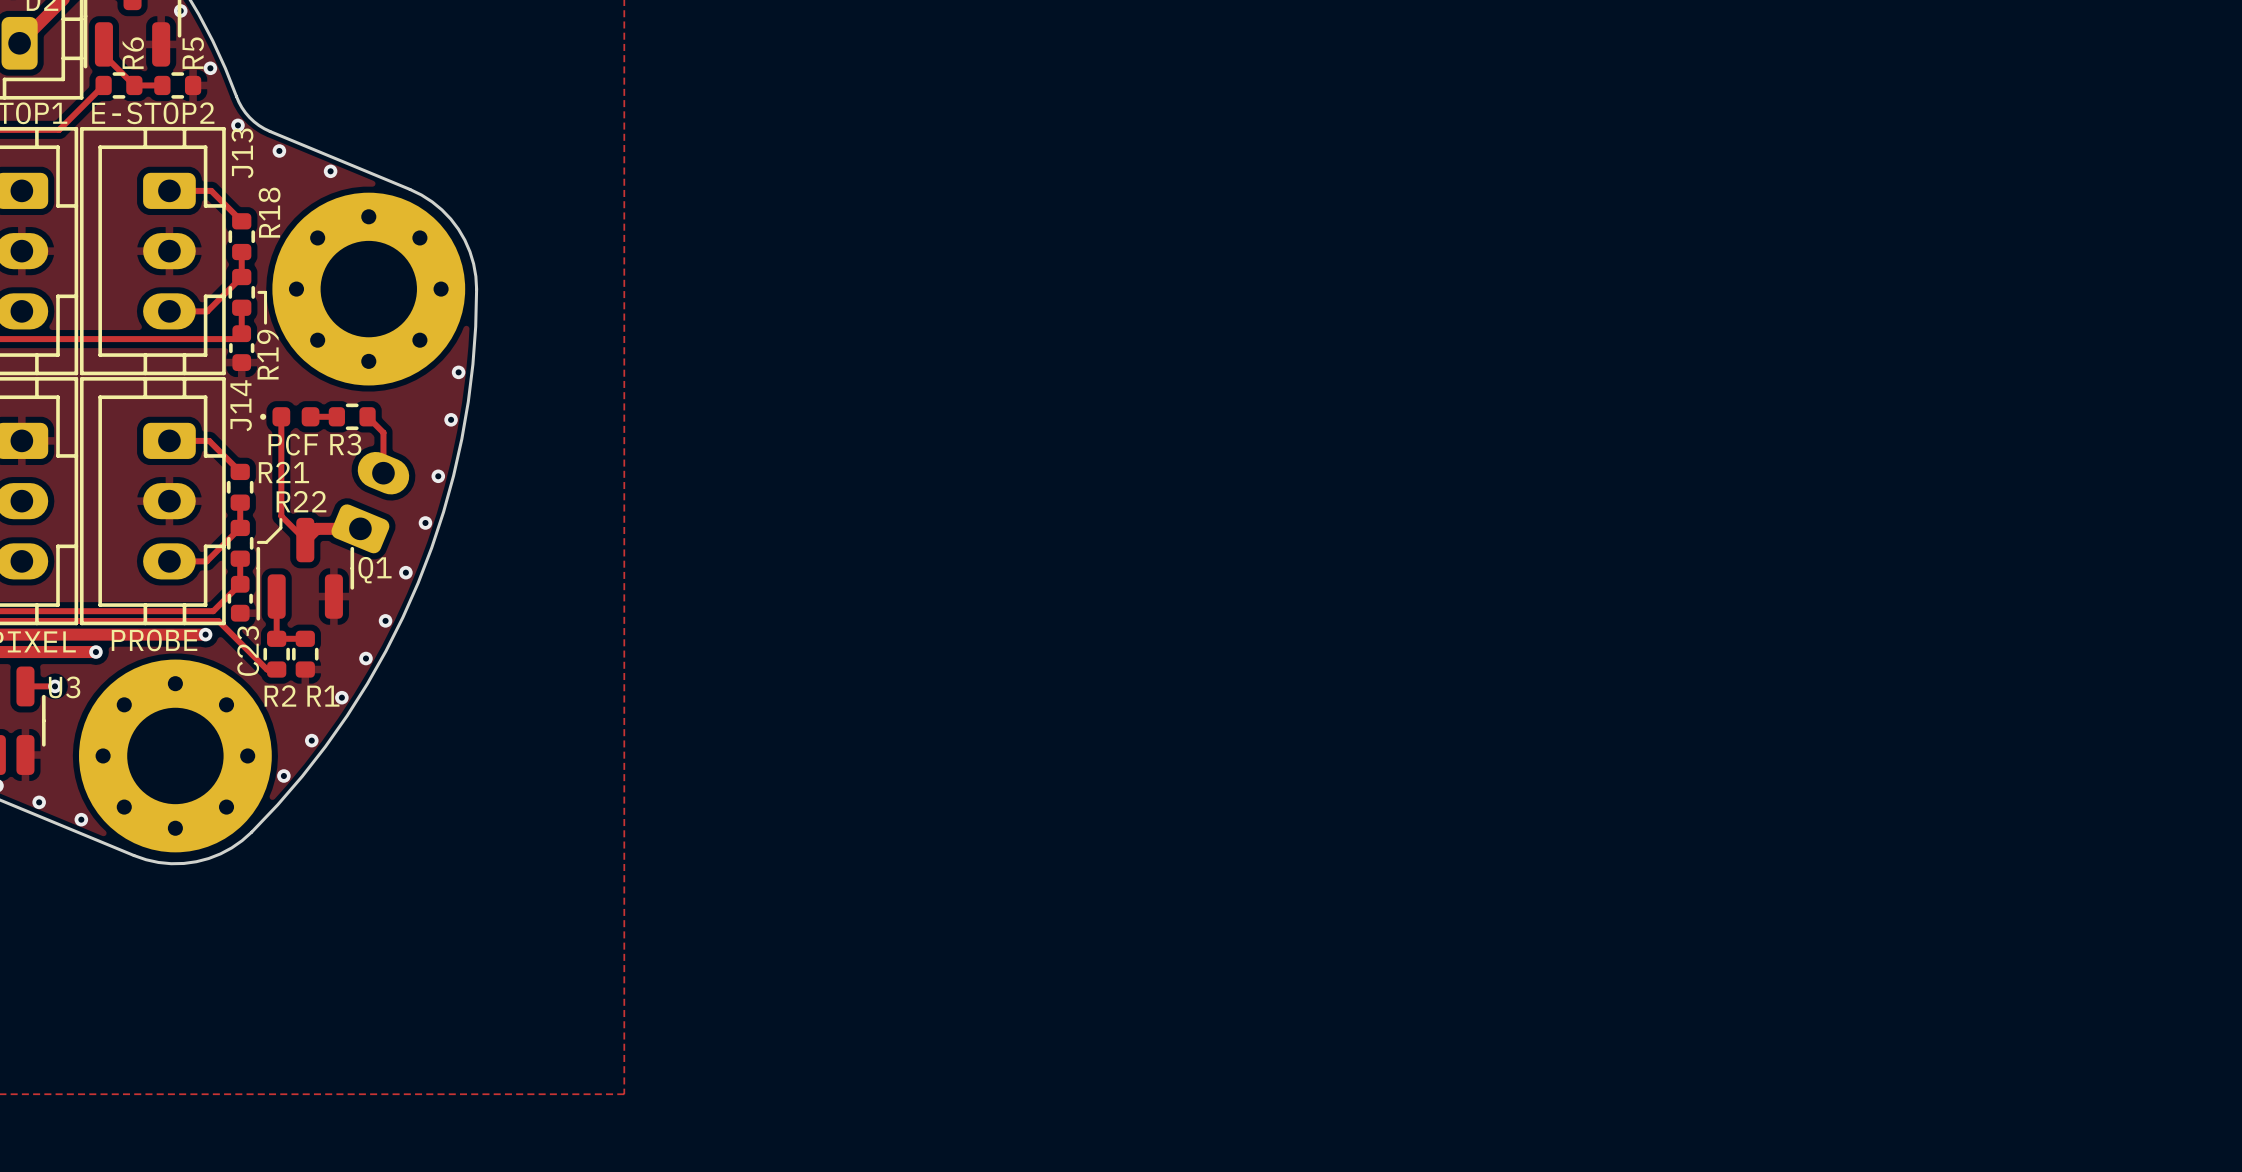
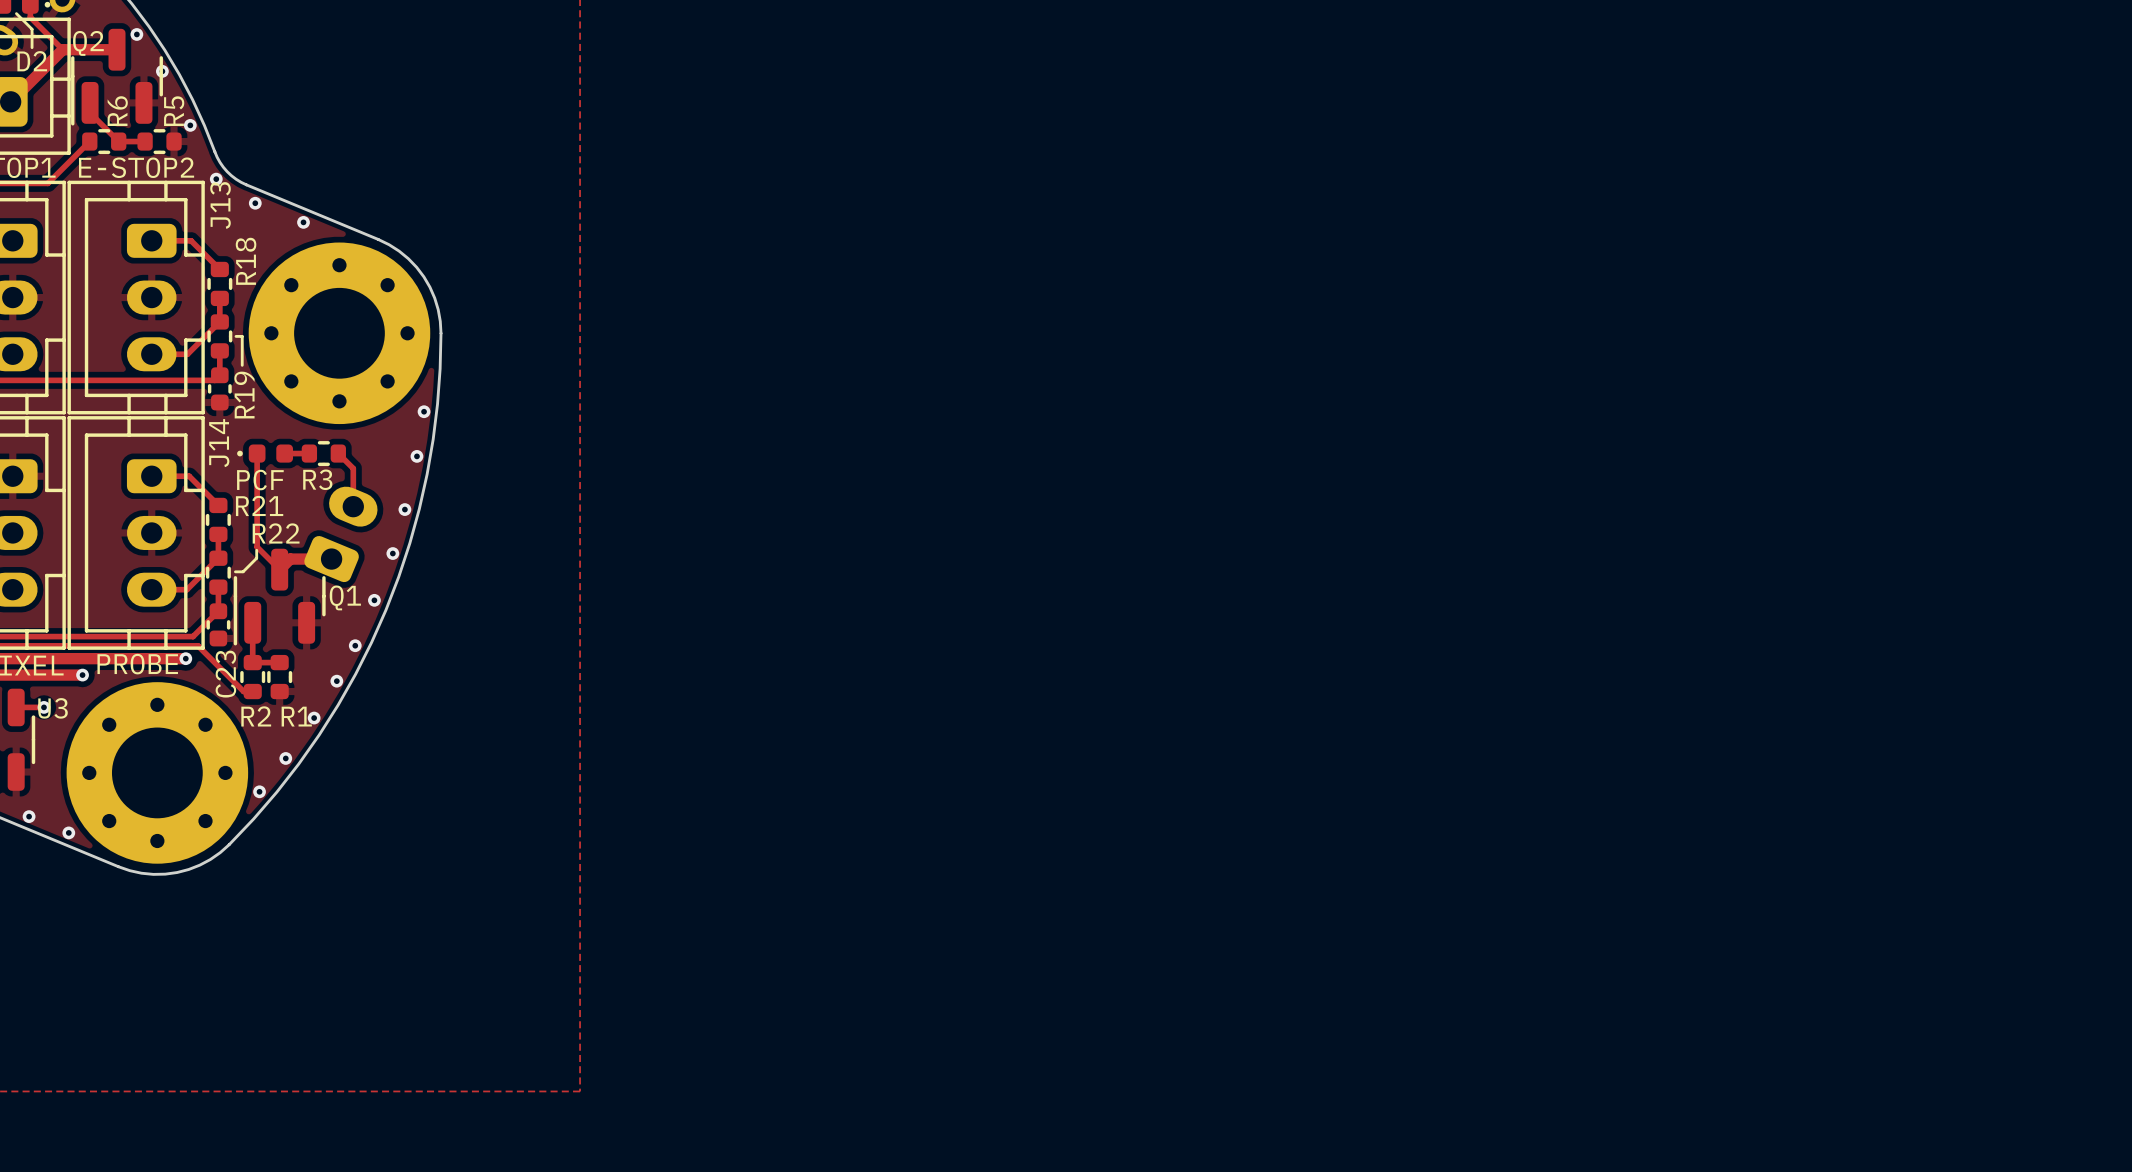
part value: none -> PCF (260, 480)
text: PCF (293, 444) -> none

